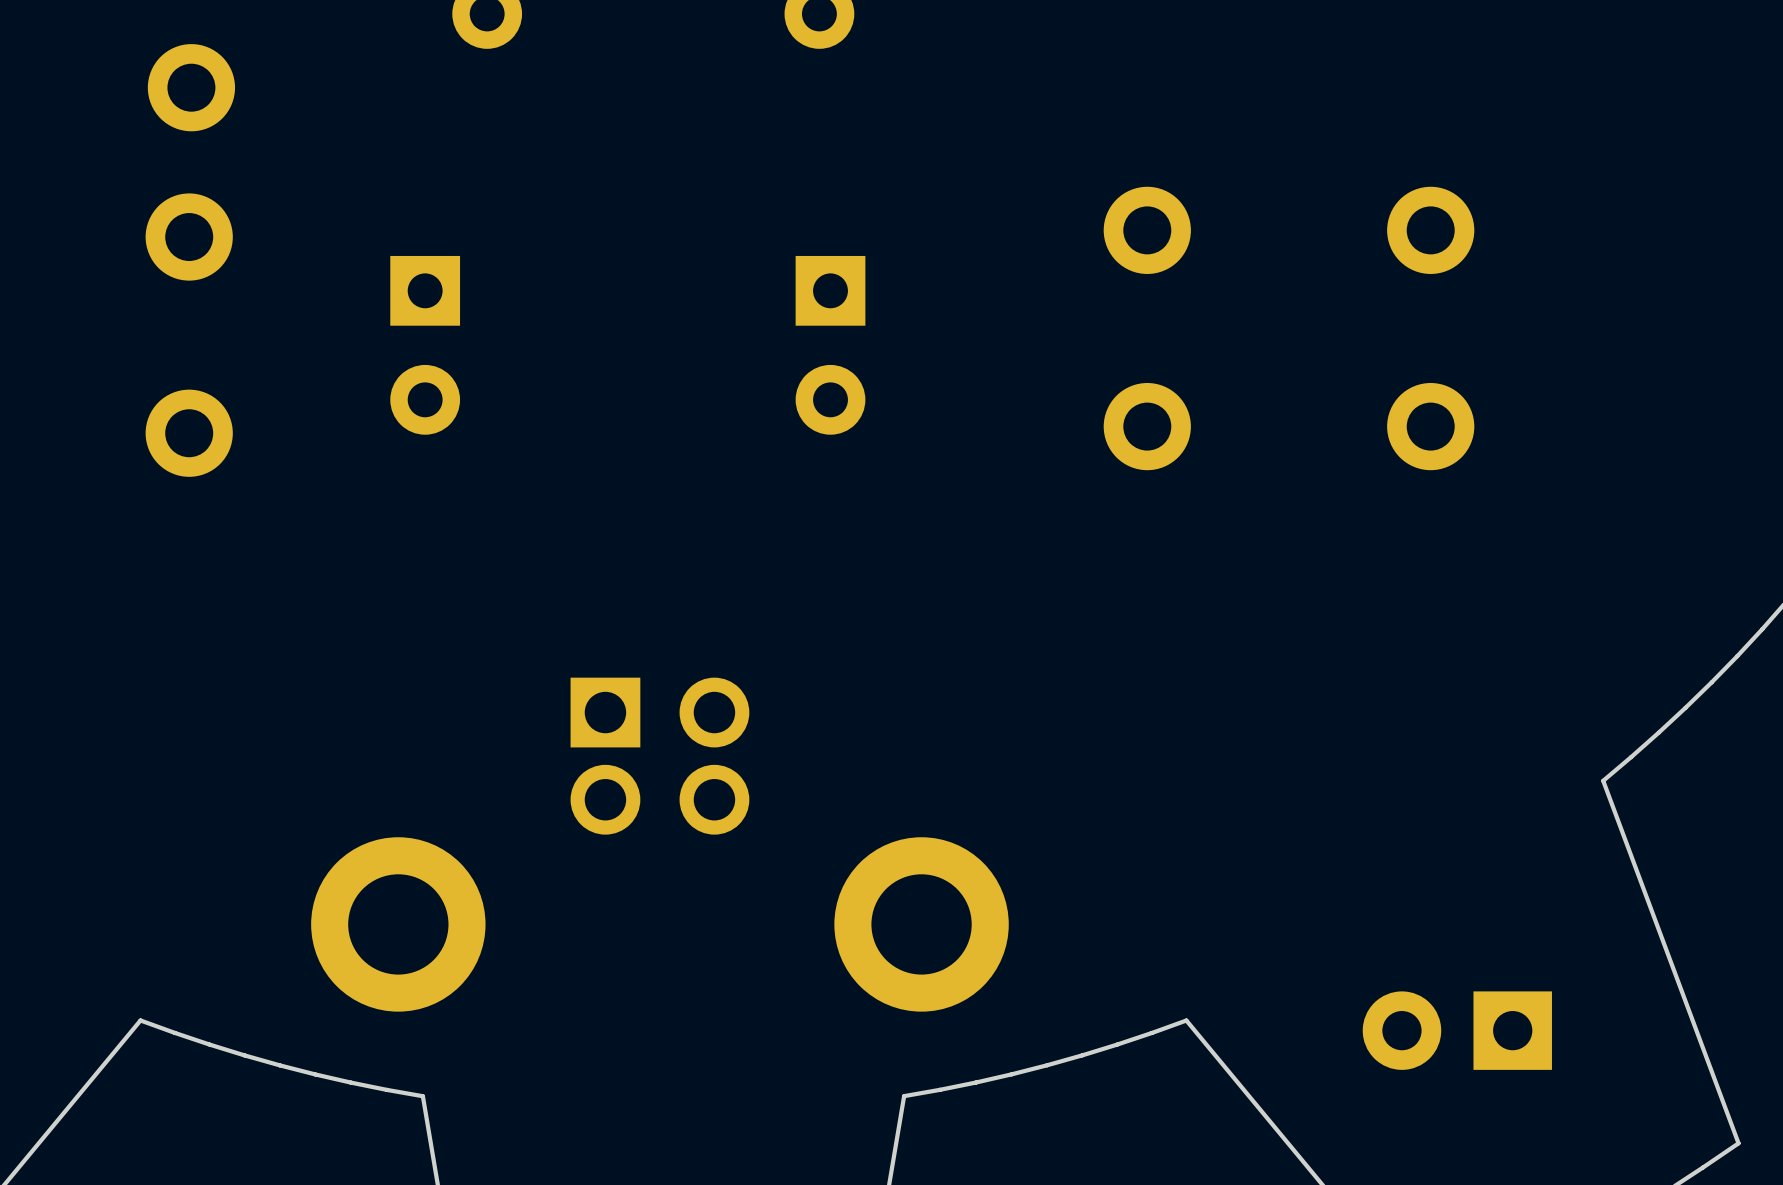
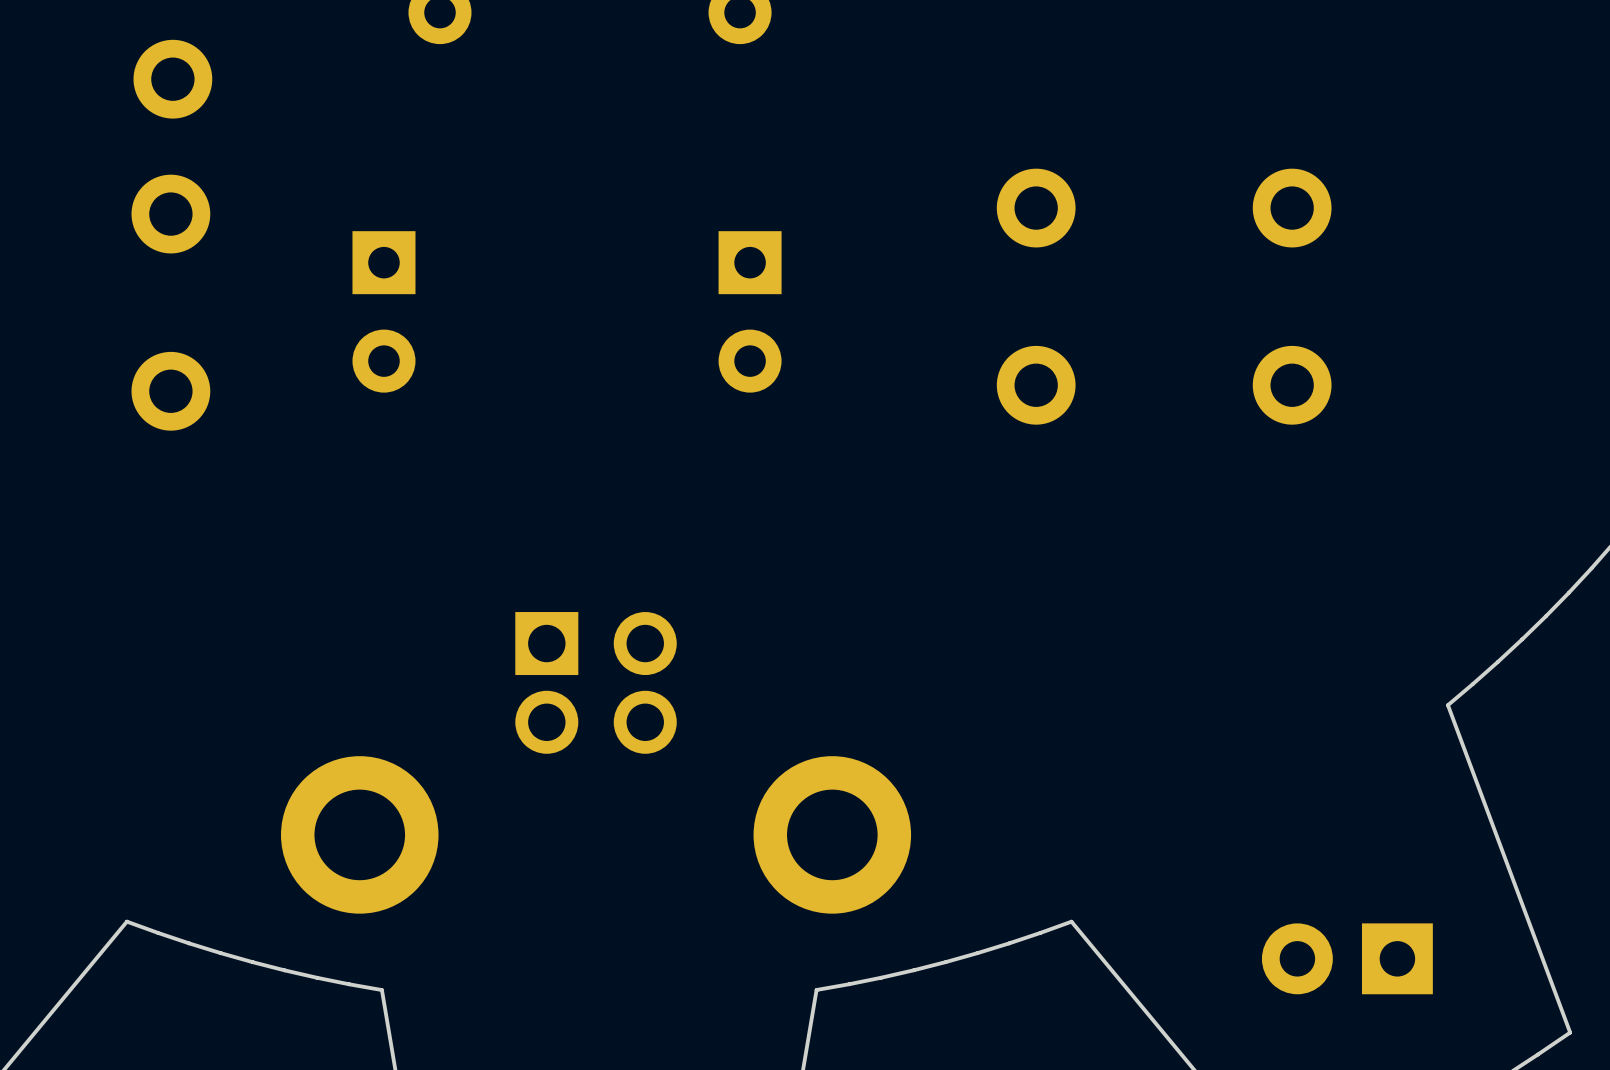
part position: (1457, 1030) -> (1347, 958)

